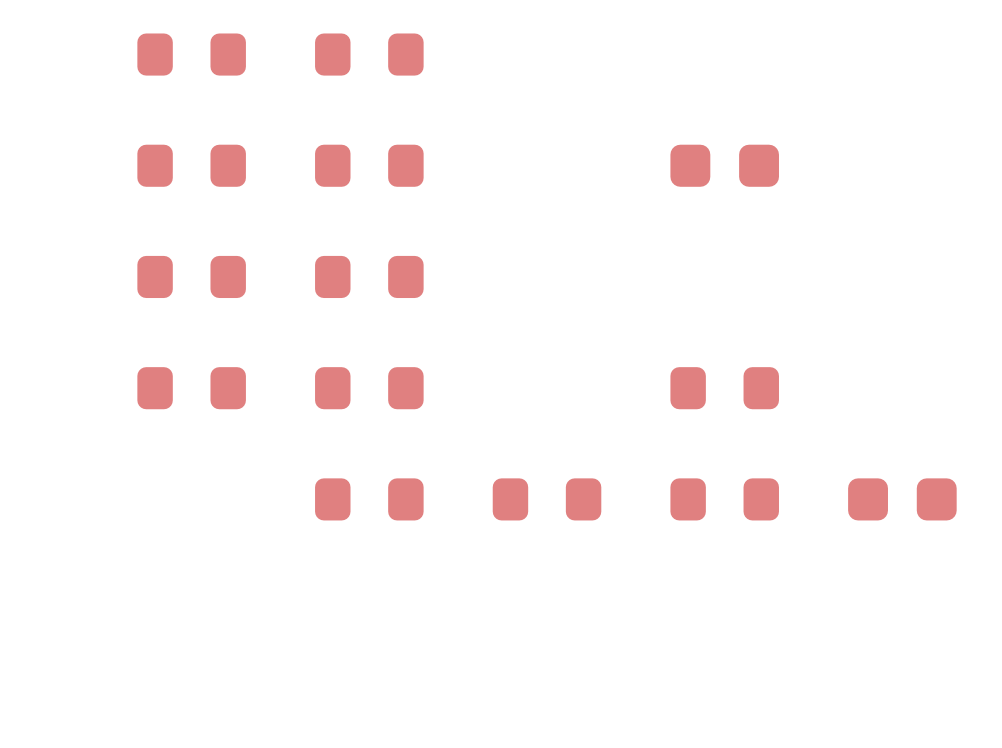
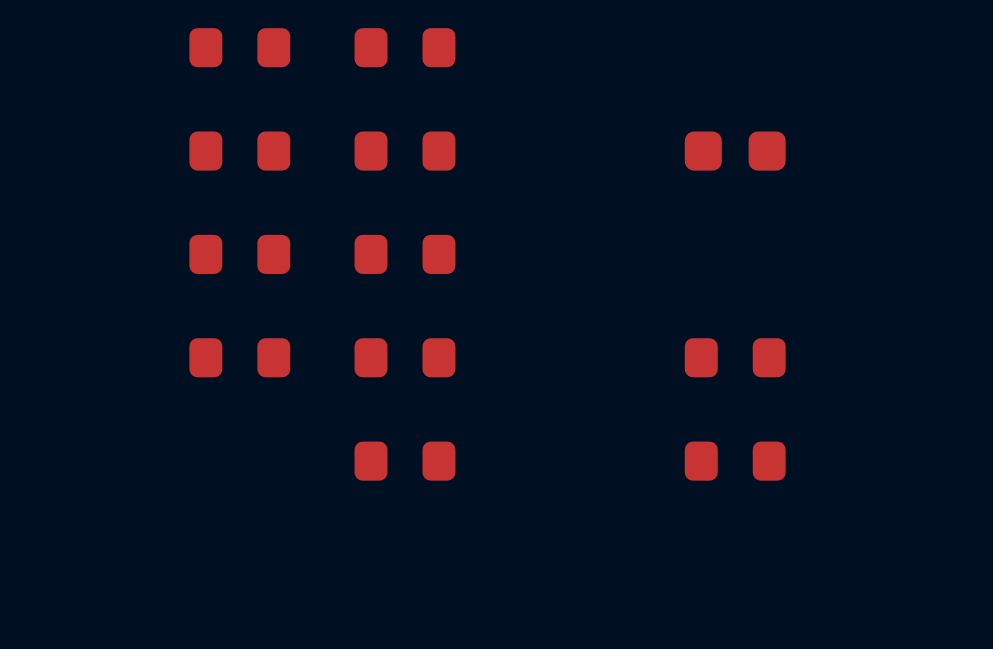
part: (547, 499) -> none
part: (902, 499) -> none

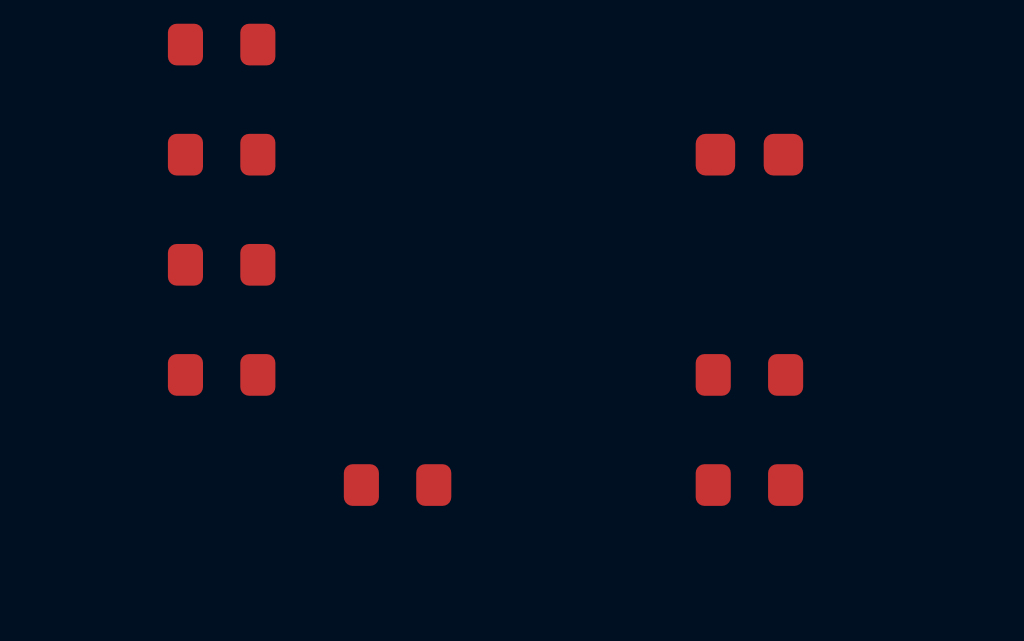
part: (404, 47) -> none
part: (404, 151) -> none
part: (404, 254) -> none
part: (404, 357) -> none

